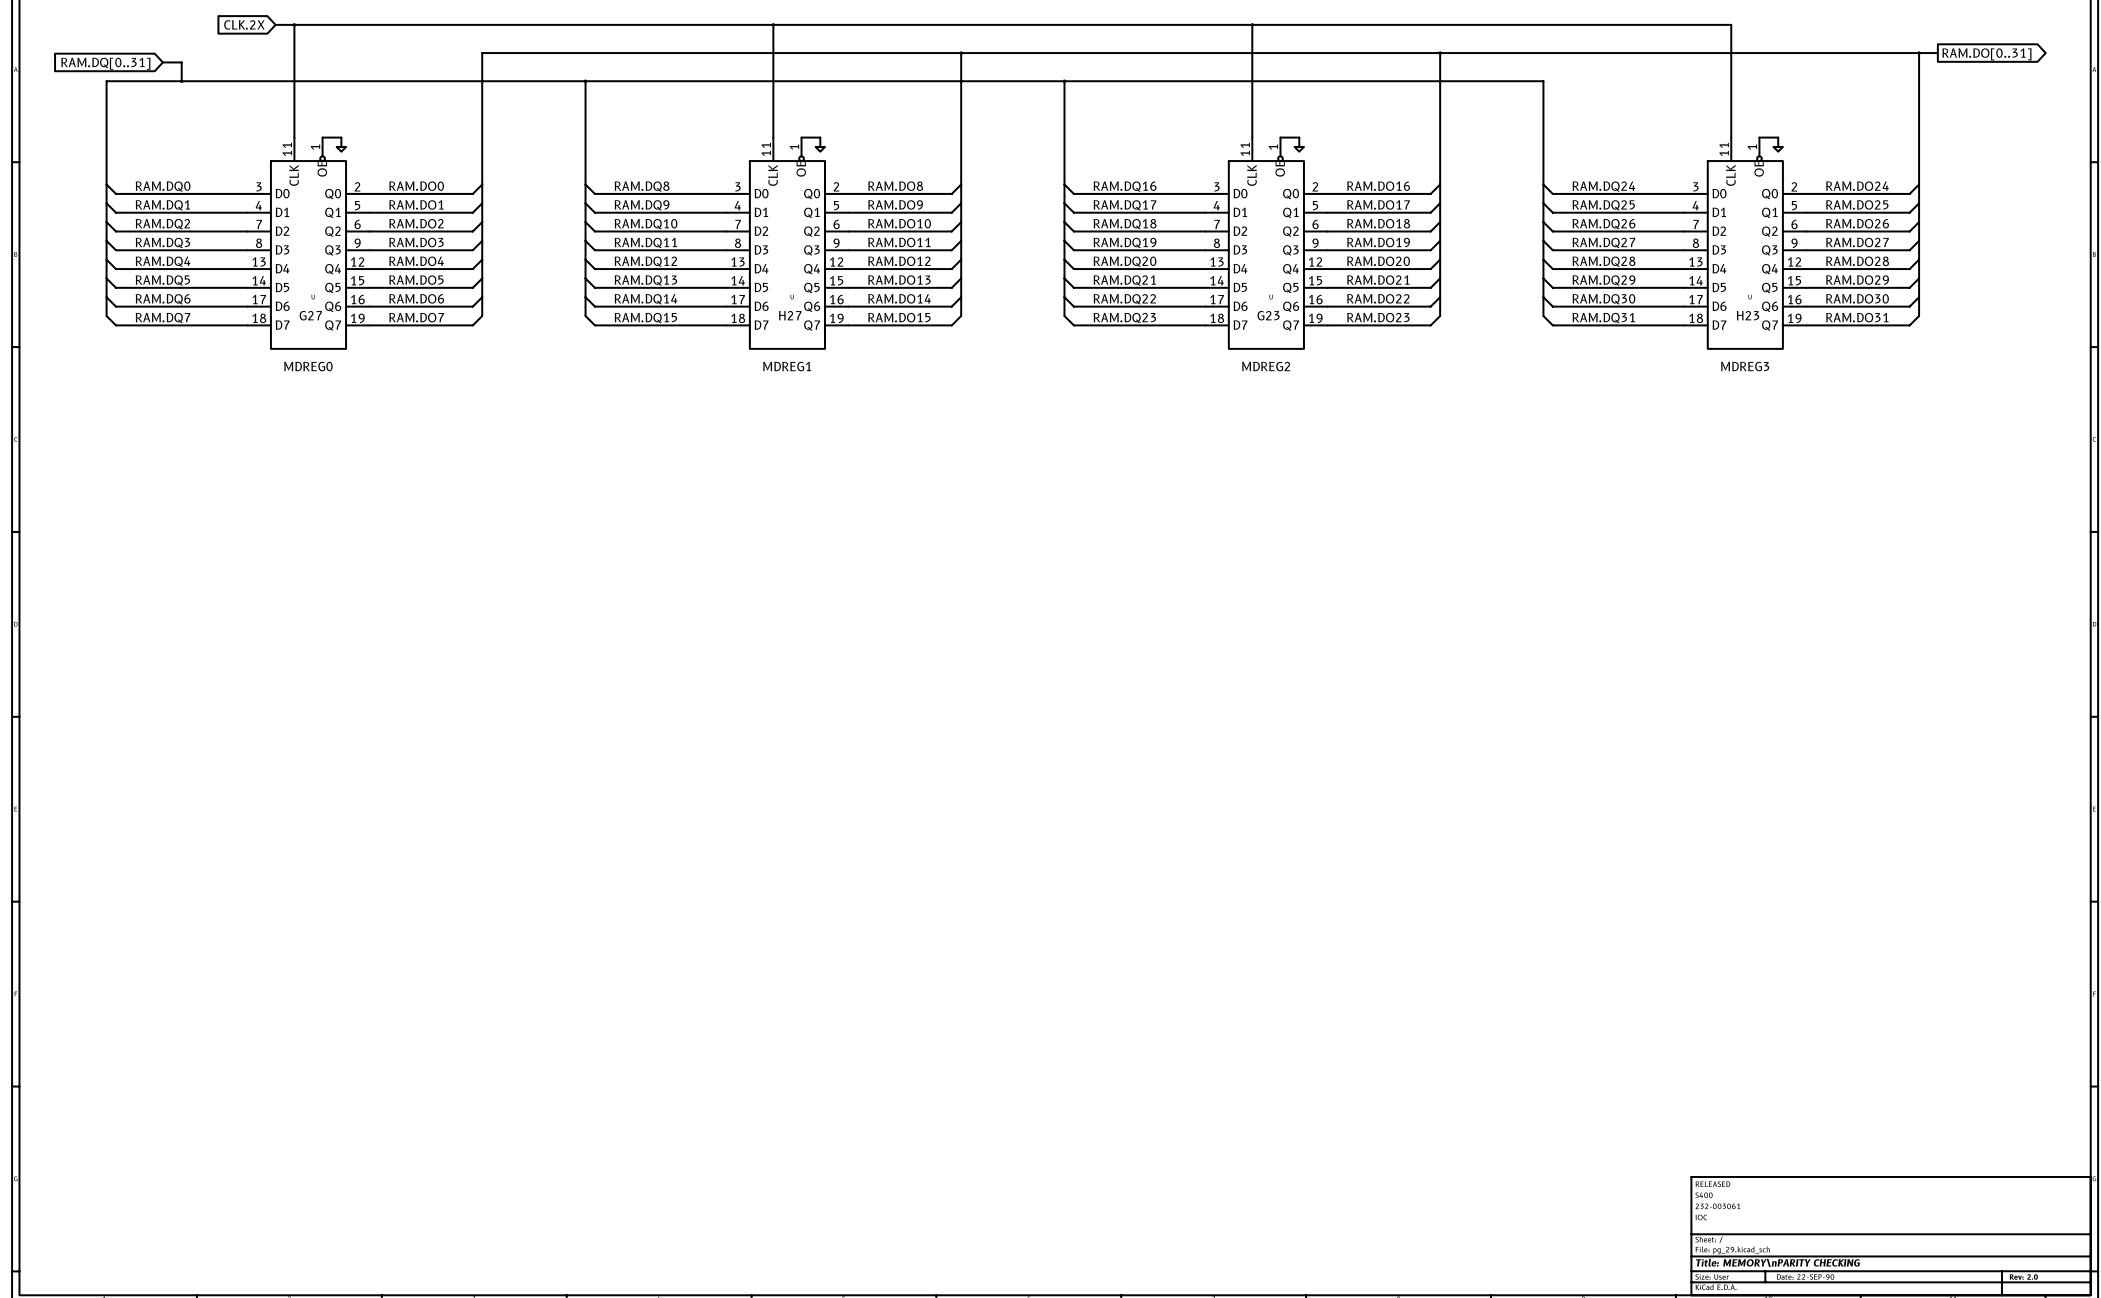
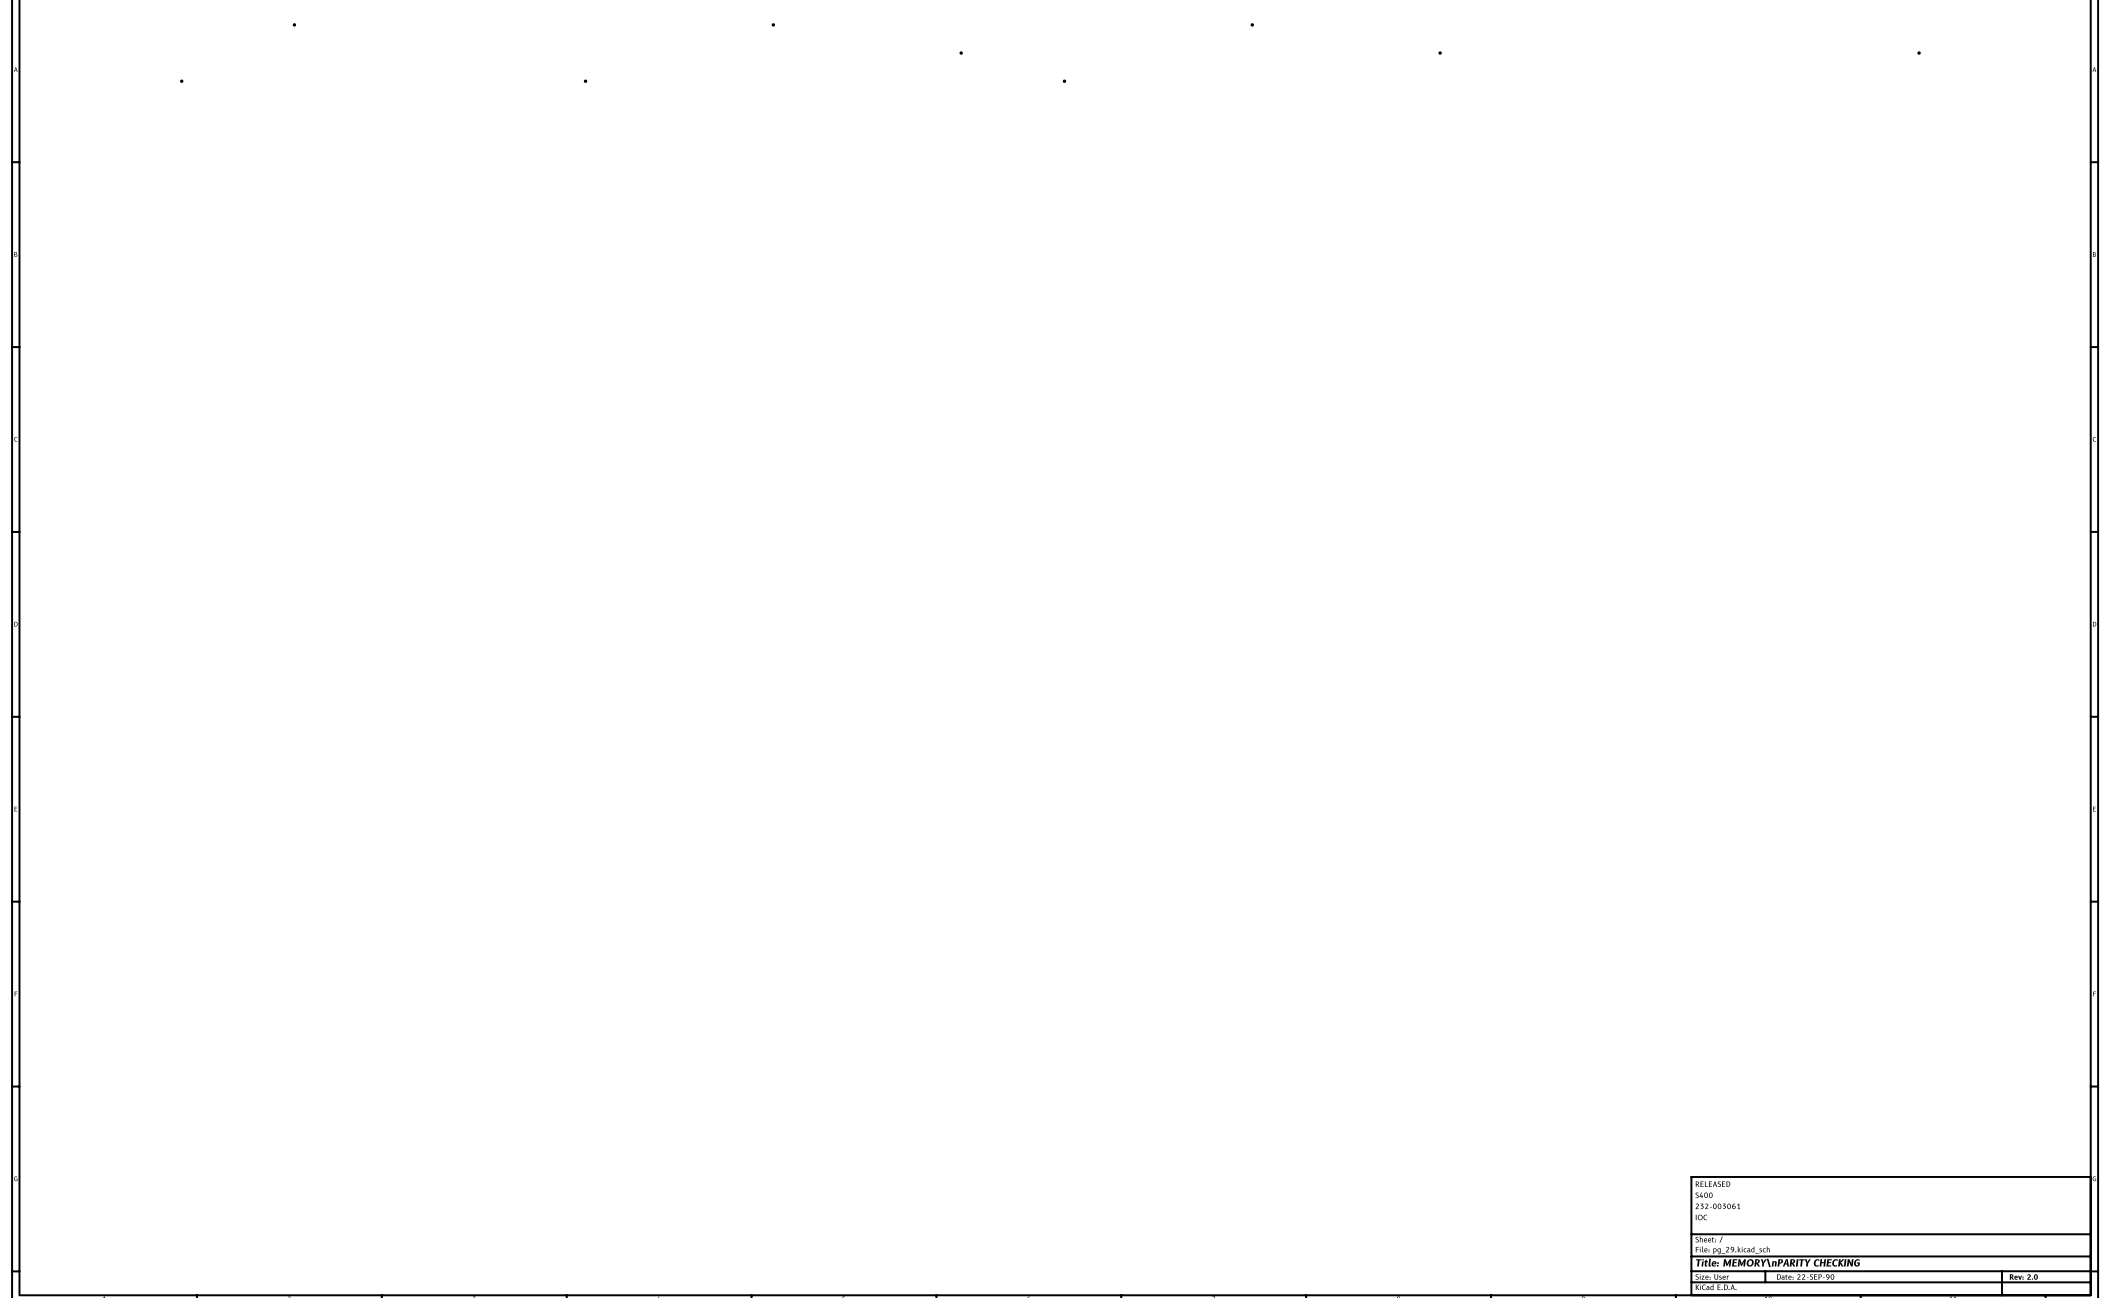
global label: CLK.2X (244, 24) -> none
wire: (275, 24) (1731, 24) (1731, 137) -> none
wire: (294, 24) (294, 137) -> none
wire: (773, 24) (773, 137) -> none
wire: (1252, 24) (1252, 137) -> none
bus: (961, 53) (961, 316) -> none
bus: (1440, 53) (1440, 316) -> none
bus: (1919, 53) (1919, 316) -> none
bus: (1937, 53) (482, 53) (482, 316) -> none
global label: RAM.DO[0..31] (1986, 54) -> none
bus: (162, 62) (181, 62) (181, 81) -> none
global label: RAM.DQ[0..31] (105, 63) -> none
bus: (585, 81) (585, 316) -> none
bus: (1064, 81) (1064, 316) -> none
wire: (322, 137) (341, 137) -> none
wire: (801, 137) (820, 137) -> none
wire: (1280, 137) (1299, 137) -> none
wire: (1759, 137) (1778, 137) -> none
power symbol: (341, 144) -> none
power symbol: (820, 144) -> none
power symbol: (1299, 144) -> none
power symbol: (1778, 144) -> none
wire: (106, 184) (115, 193) (247, 193) -> none
wire: (482, 184) (472, 193) (369, 193) -> none
wire: (585, 184) (594, 193) (726, 193) -> none
wire: (961, 184) (951, 193) (848, 193) -> none
wire: (1064, 184) (1073, 193) (1205, 193) -> none
wire: (1440, 184) (1430, 193) (1327, 193) -> none
wire: (1543, 184) (1552, 193) (1684, 193) -> none
wire: (1919, 184) (1909, 193) (1806, 193) -> none
label: RAM.DQ0 (163, 186) -> none
label: RAM.DO0 (416, 186) -> none
label: RAM.DQ8 (642, 186) -> none
label: RAM.DO8 (895, 186) -> none
label: RAM.DQ16 (1125, 186) -> none
label: RAM.DO16 (1378, 186) -> none
label: RAM.DQ24 (1603, 186) -> none
label: RAM.DO24 (1857, 186) -> none
wire: (106, 203) (115, 212) (247, 212) -> none
wire: (482, 203) (472, 212) (369, 212) -> none
wire: (585, 203) (594, 212) (726, 212) -> none
wire: (961, 203) (951, 212) (848, 212) -> none
wire: (1064, 203) (1073, 212) (1205, 212) -> none
wire: (1440, 203) (1430, 212) (1327, 212) -> none
wire: (1543, 203) (1552, 212) (1684, 212) -> none
wire: (1919, 203) (1909, 212) (1806, 212) -> none
label: RAM.DO1 (416, 204) -> none
label: RAM.DO9 (895, 204) -> none
label: RAM.DO17 (1378, 204) -> none
label: RAM.DO25 (1857, 204) -> none
label: RAM.DQ1 (162, 205) -> none
label: RAM.DQ9 (642, 205) -> none
label: RAM.DQ17 (1124, 205) -> none
label: RAM.DQ25 (1603, 205) -> none
wire: (106, 222) (115, 231) (247, 231) -> none
wire: (482, 222) (472, 231) (369, 231) -> none
wire: (585, 222) (594, 231) (726, 231) -> none
wire: (961, 222) (951, 231) (848, 231) -> none
wire: (1064, 222) (1073, 231) (1205, 231) -> none
wire: (1440, 222) (1430, 231) (1327, 231) -> none
wire: (1543, 222) (1552, 231) (1684, 231) -> none
wire: (1919, 222) (1909, 231) (1806, 231) -> none
label: RAM.DO2 (416, 223) -> none
label: RAM.DO10 (899, 223) -> none
label: RAM.DO18 (1378, 223) -> none
label: RAM.DO26 (1857, 223) -> none
label: RAM.DQ2 (162, 224) -> none
label: RAM.DQ10 (646, 224) -> none
label: RAM.DQ18 (1125, 224) -> none
label: RAM.DQ26 (1603, 224) -> none
wire: (106, 240) (115, 250) (247, 250) -> none
wire: (482, 240) (472, 250) (369, 250) -> none
wire: (585, 240) (594, 250) (726, 250) -> none
wire: (961, 240) (951, 250) (848, 250) -> none
wire: (1064, 240) (1073, 250) (1205, 250) -> none
wire: (1440, 240) (1430, 250) (1327, 250) -> none
wire: (1543, 240) (1552, 250) (1684, 250) -> none
wire: (1919, 240) (1909, 250) (1806, 250) -> none
label: RAM.DQ3 (162, 242) -> none
label: RAM.DO3 (416, 242) -> none
label: RAM.DQ11 (645, 242) -> none
label: RAM.DO11 (899, 242) -> none
label: RAM.DQ19 (1125, 242) -> none
label: RAM.DO19 (1378, 242) -> none
label: RAM.DQ27 (1603, 242) -> none
label: RAM.DO27 (1857, 242) -> none
part: (308, 243) -> none
part: (787, 243) -> none
part: (1266, 243) -> none
part: (1745, 243) -> none
wire: (106, 259) (115, 269) (247, 269) -> none
wire: (482, 259) (472, 269) (369, 269) -> none
wire: (585, 259) (594, 269) (726, 269) -> none
wire: (961, 259) (951, 269) (848, 269) -> none
wire: (1064, 259) (1073, 269) (1205, 269) -> none
wire: (1440, 259) (1430, 269) (1327, 269) -> none
wire: (1543, 259) (1552, 269) (1684, 269) -> none
wire: (1919, 259) (1909, 269) (1806, 269) -> none
label: RAM.DQ4 (163, 261) -> none
label: RAM.DO4 (416, 261) -> none
label: RAM.DQ12 (645, 261) -> none
label: RAM.DO12 (899, 261) -> none
label: RAM.DQ20 (1124, 261) -> none
label: RAM.DO20 (1378, 261) -> none
label: RAM.DQ28 (1604, 261) -> none
label: RAM.DO28 (1857, 261) -> none
wire: (106, 278) (115, 287) (247, 287) -> none
wire: (482, 278) (472, 287) (369, 287) -> none
wire: (585, 278) (594, 287) (726, 287) -> none
wire: (961, 278) (951, 287) (848, 287) -> none
wire: (1064, 278) (1073, 287) (1205, 287) -> none
wire: (1440, 278) (1430, 287) (1327, 287) -> none
wire: (1543, 278) (1552, 287) (1684, 287) -> none
wire: (1919, 278) (1909, 287) (1806, 287) -> none
label: RAM.DQ5 (162, 280) -> none
label: RAM.DO5 (416, 280) -> none
label: RAM.DQ13 (645, 280) -> none
label: RAM.DO13 (899, 280) -> none
label: RAM.DQ21 (1124, 280) -> none
label: RAM.DO21 (1378, 280) -> none
label: RAM.DQ29 (1603, 280) -> none
label: RAM.DO29 (1857, 280) -> none
wire: (106, 297) (115, 306) (247, 306) -> none
wire: (482, 297) (472, 306) (369, 306) -> none
wire: (585, 297) (594, 306) (726, 306) -> none
wire: (961, 297) (951, 306) (848, 306) -> none
wire: (1064, 297) (1073, 306) (1205, 306) -> none
wire: (1440, 297) (1430, 306) (1327, 306) -> none
wire: (1543, 297) (1552, 306) (1684, 306) -> none
wire: (1919, 297) (1909, 306) (1806, 306) -> none
label: RAM.DO6 (416, 298) -> none
label: RAM.DO14 (899, 298) -> none
label: RAM.DO22 (1378, 298) -> none
label: RAM.DO30 (1857, 298) -> none
label: RAM.DQ6 (163, 299) -> none
label: RAM.DQ14 (646, 299) -> none
label: RAM.DQ22 (1124, 299) -> none
label: RAM.DQ30 (1603, 299) -> none
wire: (106, 316) (115, 325) (247, 325) -> none
bus: (106, 316) (106, 81) (1543, 81) (1543, 316) -> none
wire: (482, 316) (472, 325) (369, 325) -> none
wire: (585, 316) (594, 325) (726, 325) -> none
wire: (961, 316) (951, 325) (848, 325) -> none
wire: (1064, 316) (1073, 325) (1205, 325) -> none
wire: (1440, 316) (1430, 325) (1327, 325) -> none
wire: (1543, 316) (1552, 325) (1684, 325) -> none
wire: (1919, 316) (1909, 325) (1806, 325) -> none
label: RAM.DO7 (416, 317) -> none
label: RAM.DO15 (899, 317) -> none
label: RAM.DO23 (1378, 317) -> none
label: RAM.DO31 (1857, 317) -> none
label: RAM.DQ7 (163, 318) -> none
label: RAM.DQ15 (645, 318) -> none
label: RAM.DQ23 (1124, 318) -> none
label: RAM.DQ31 (1603, 318) -> none

